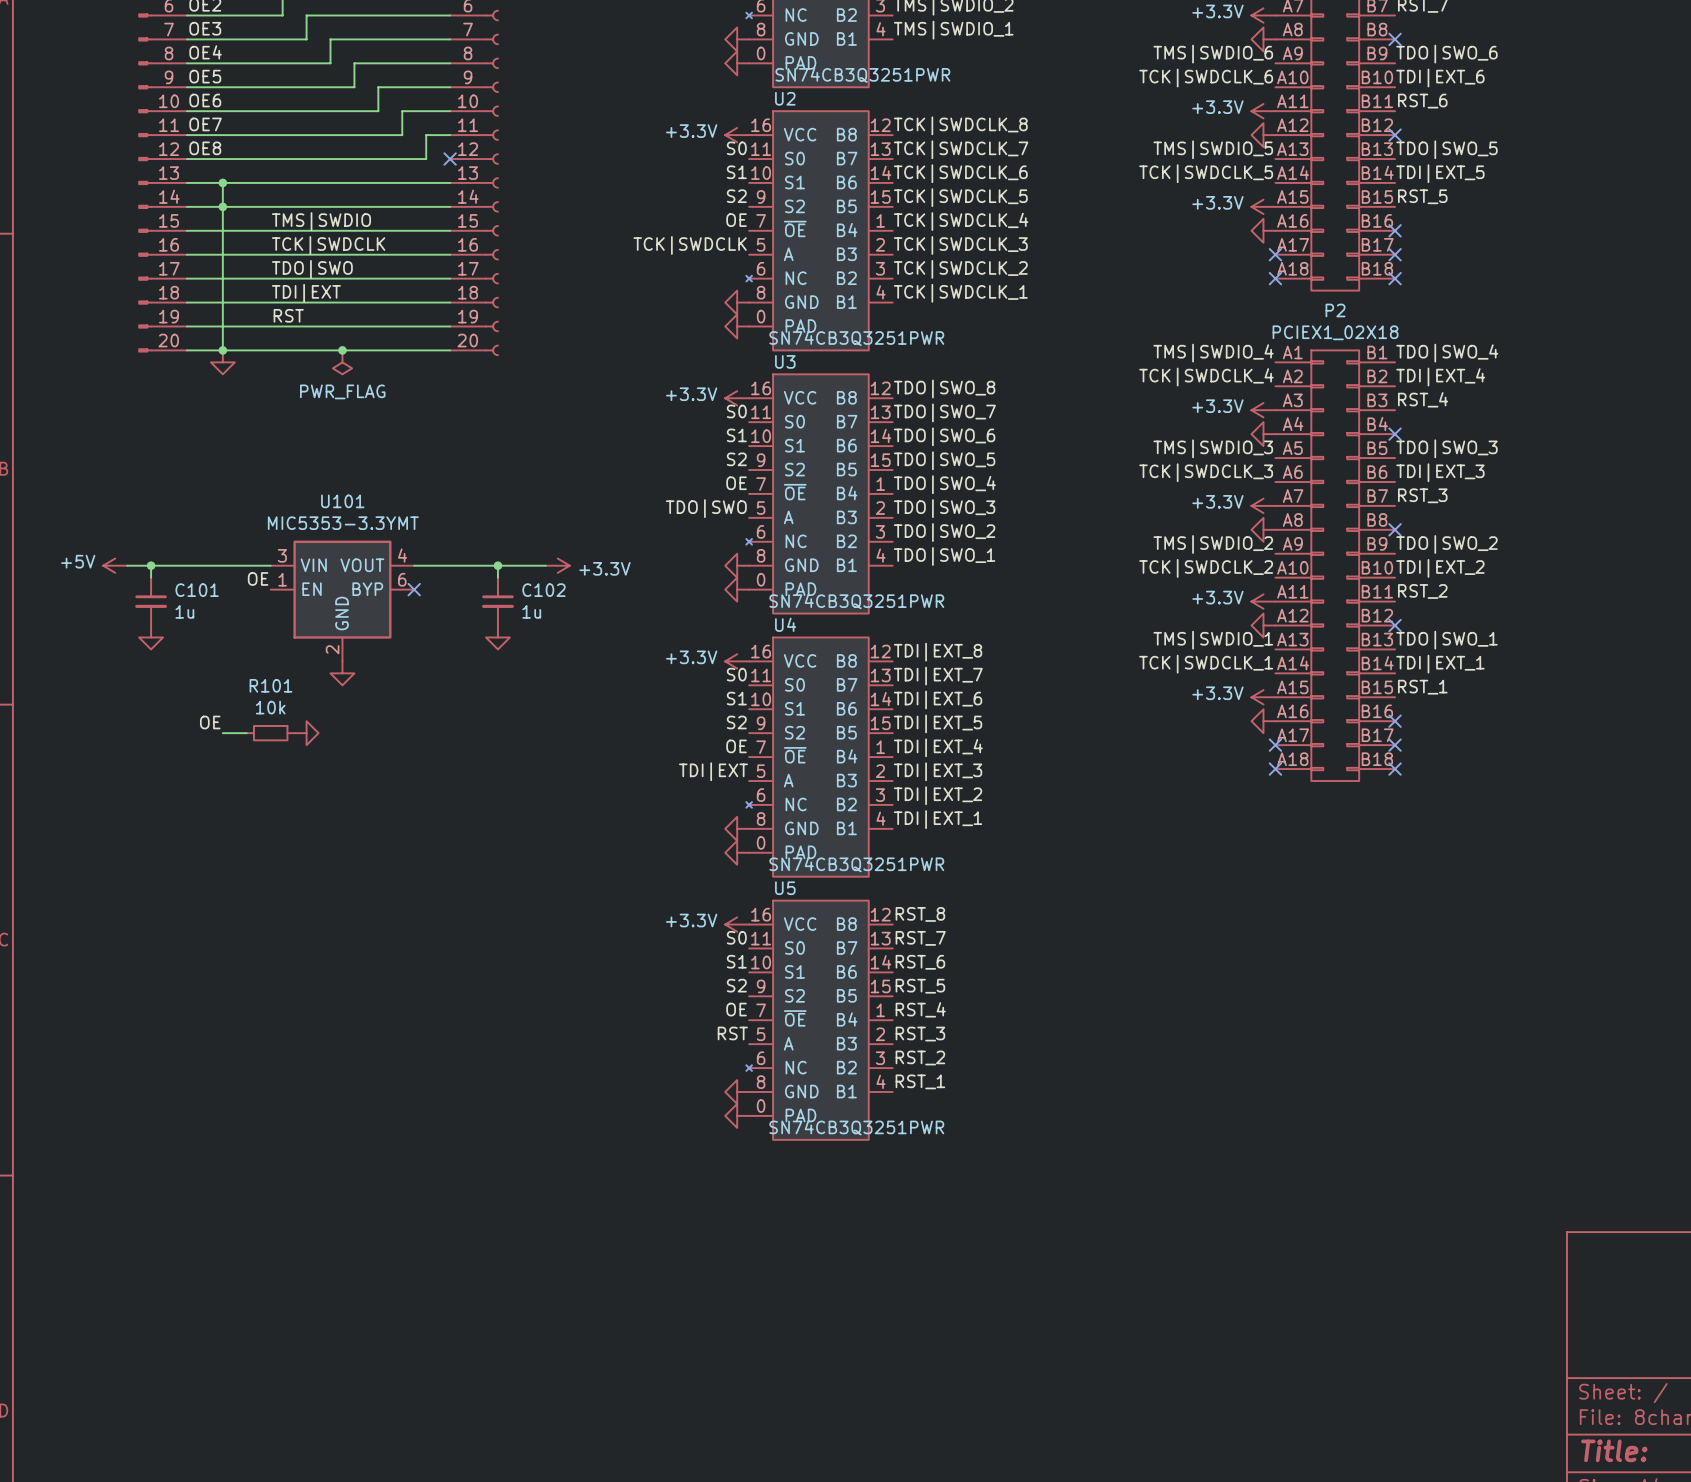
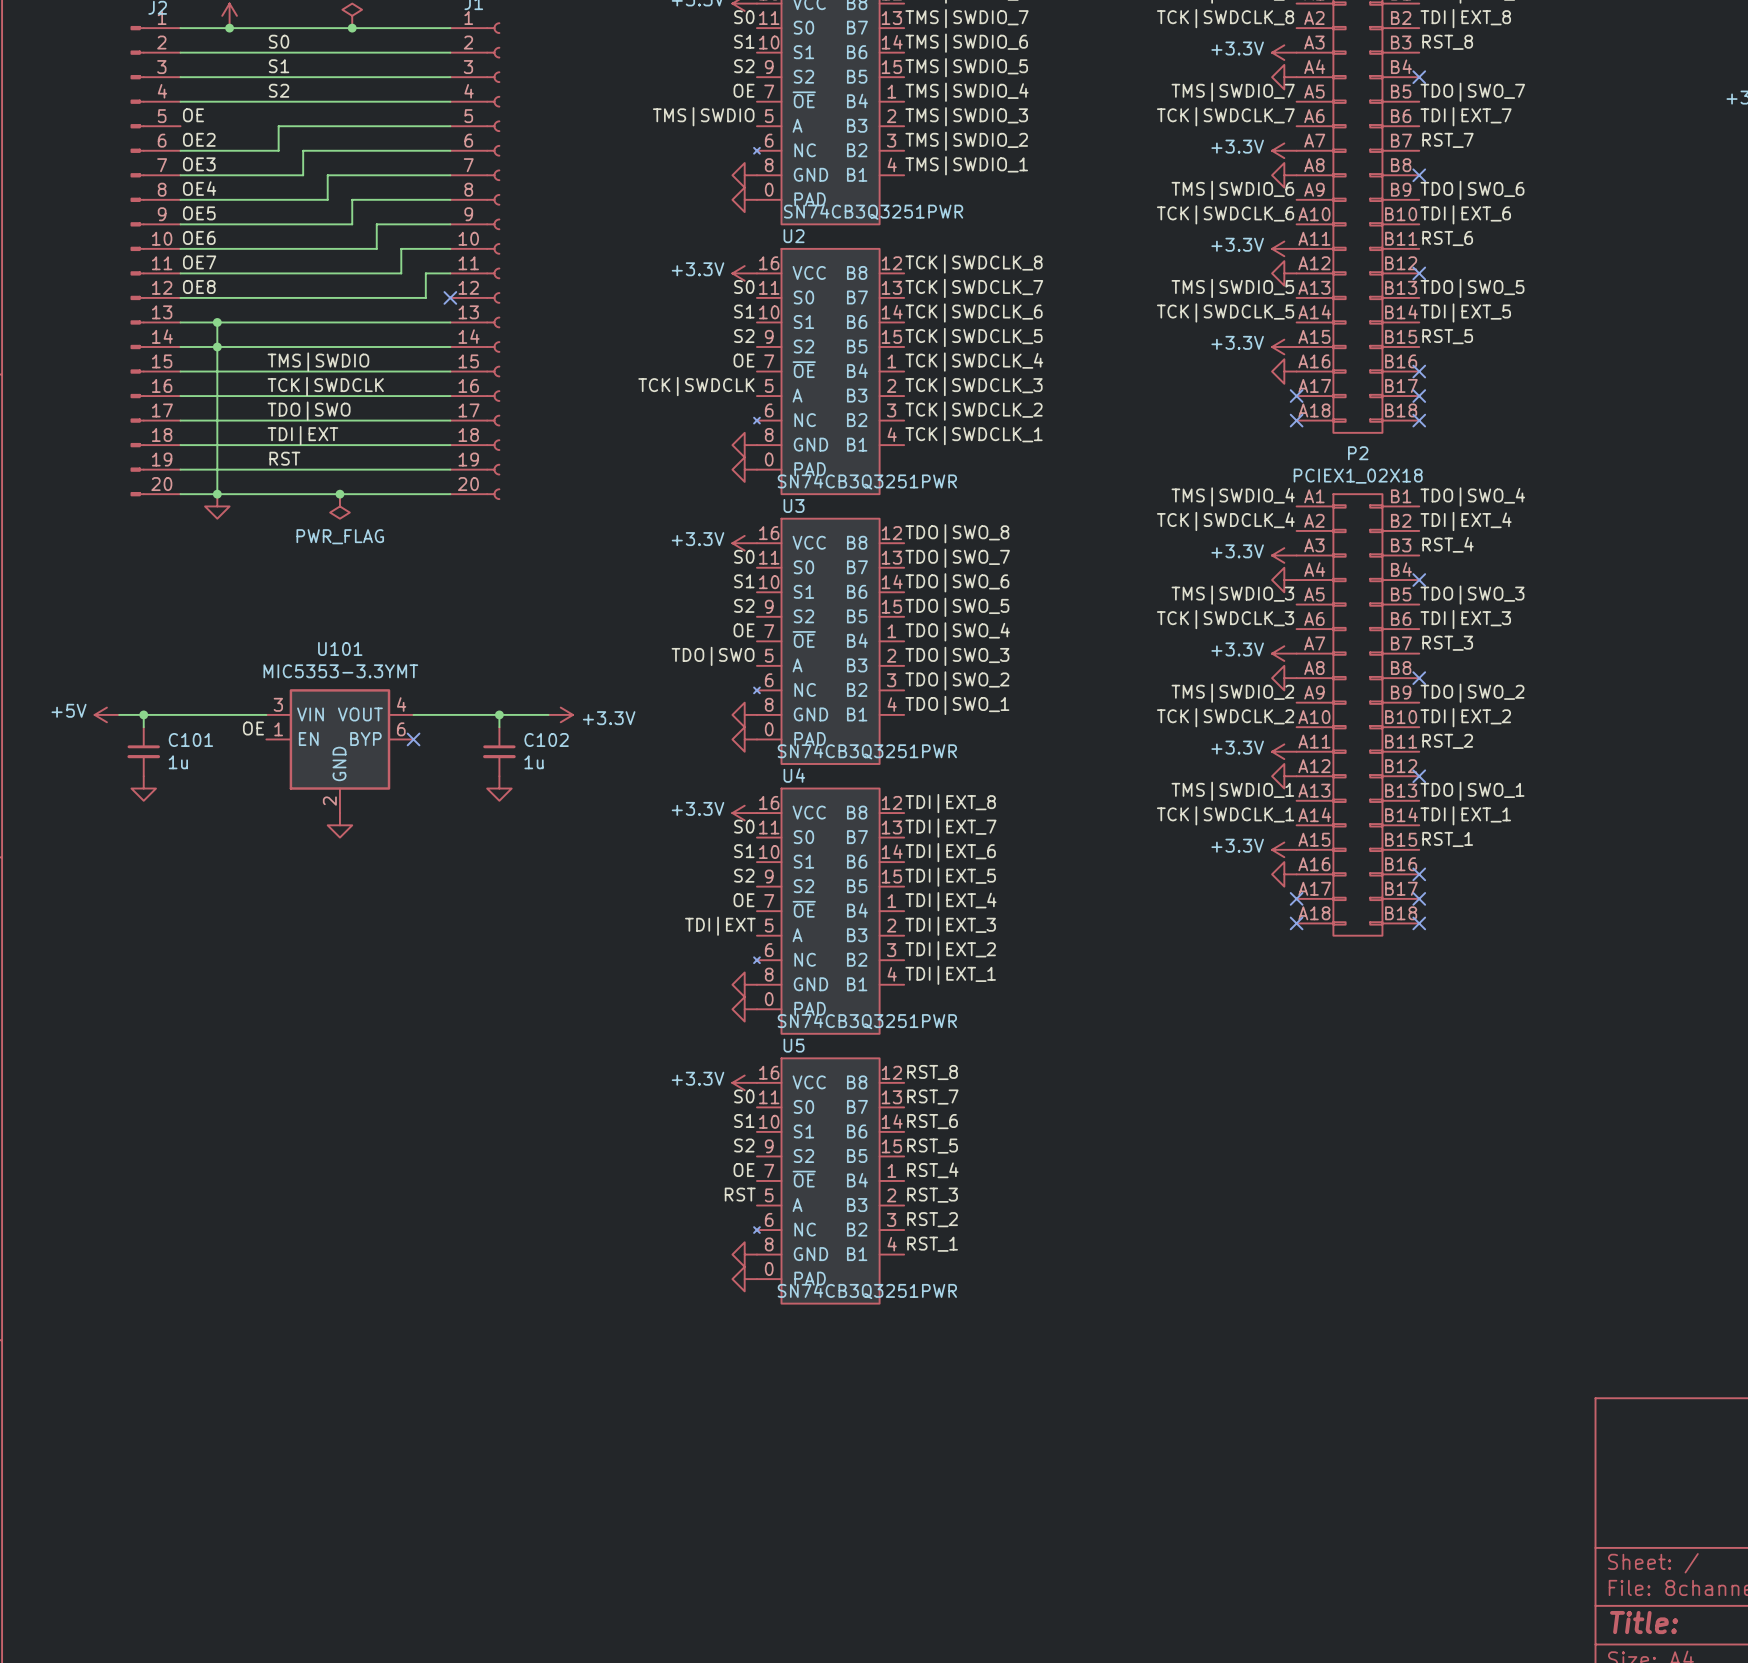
label: OE (210, 722) -> none
wire: (222, 733) (246, 733) -> none
R101: 10k (270, 733) -> none
power symbol: (306, 733) -> none

